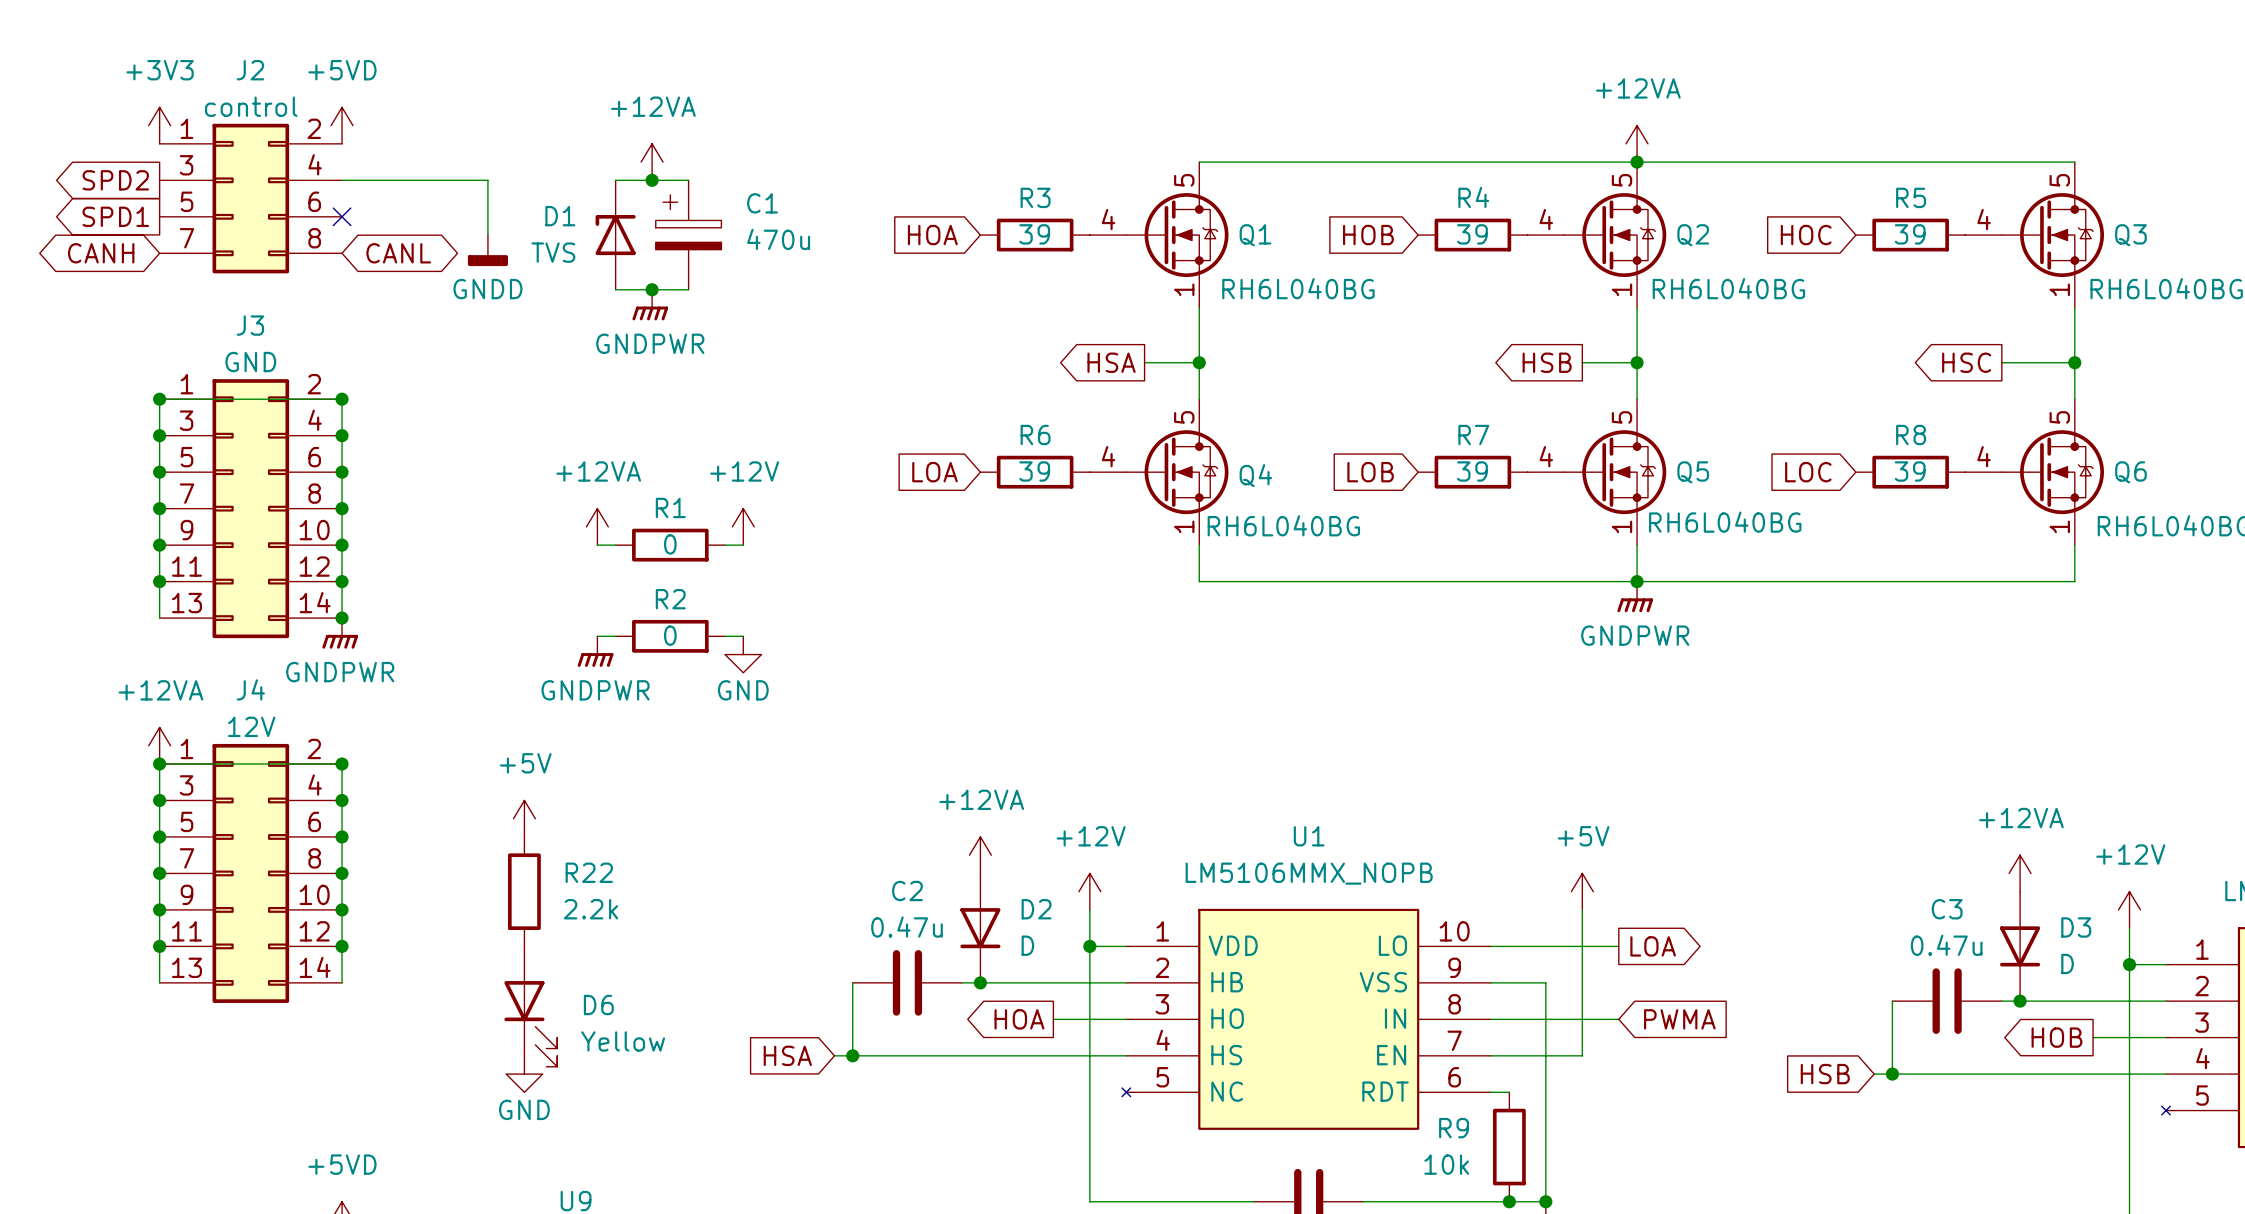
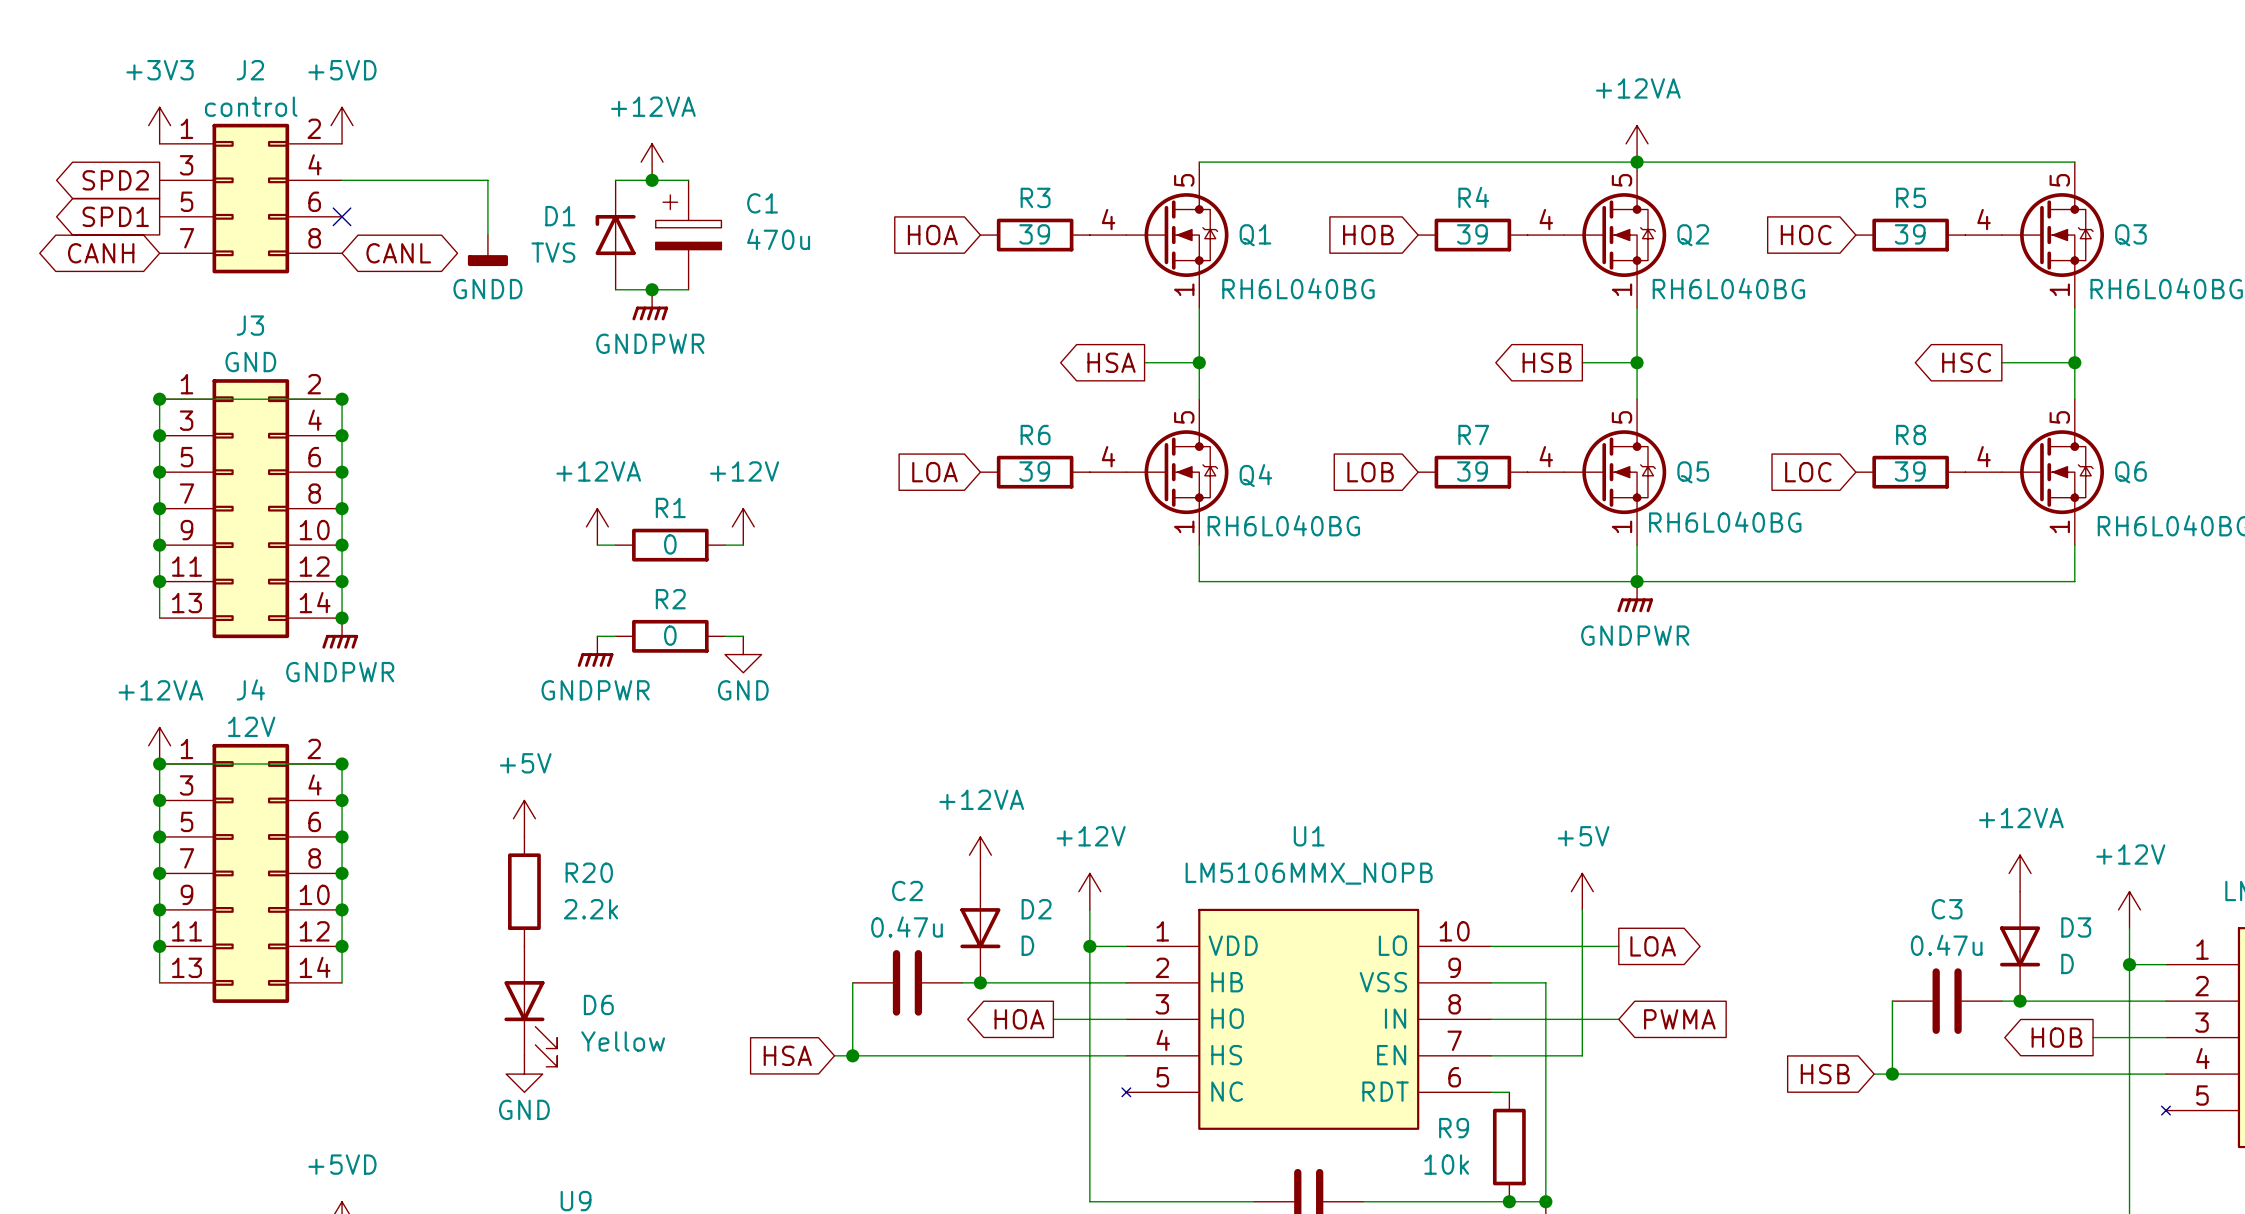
R22 name: R22 (589, 872) -> R20 (589, 872)

